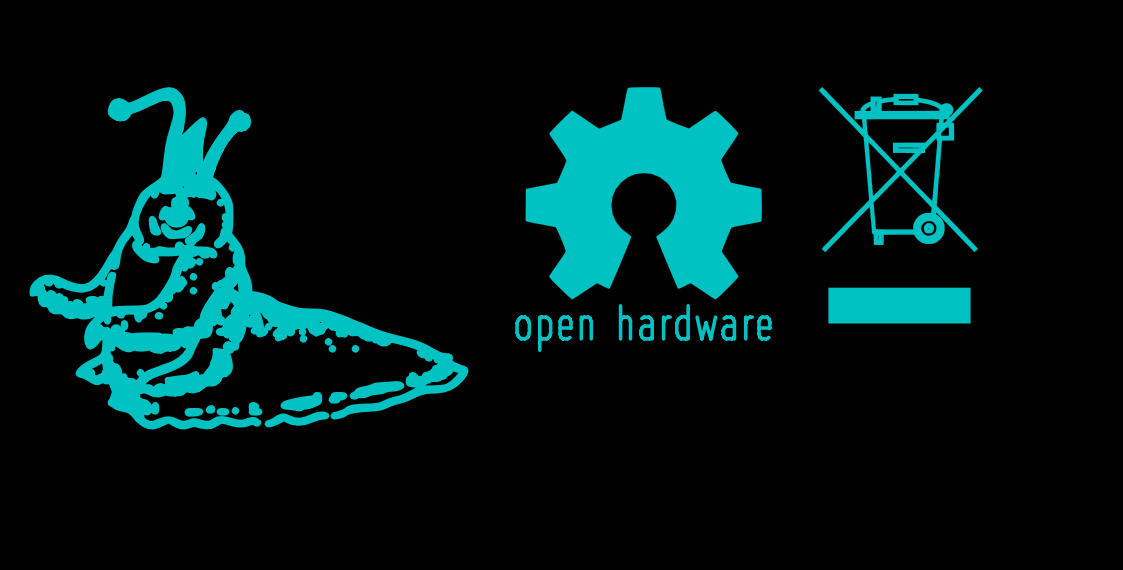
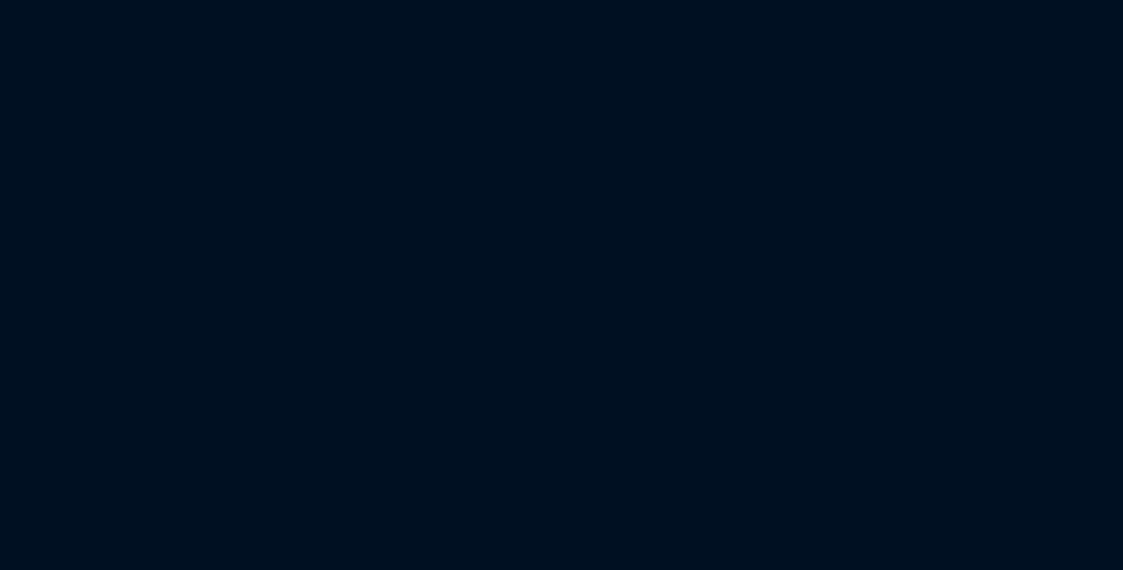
drawing: [29, 87, 983, 430] -> none

